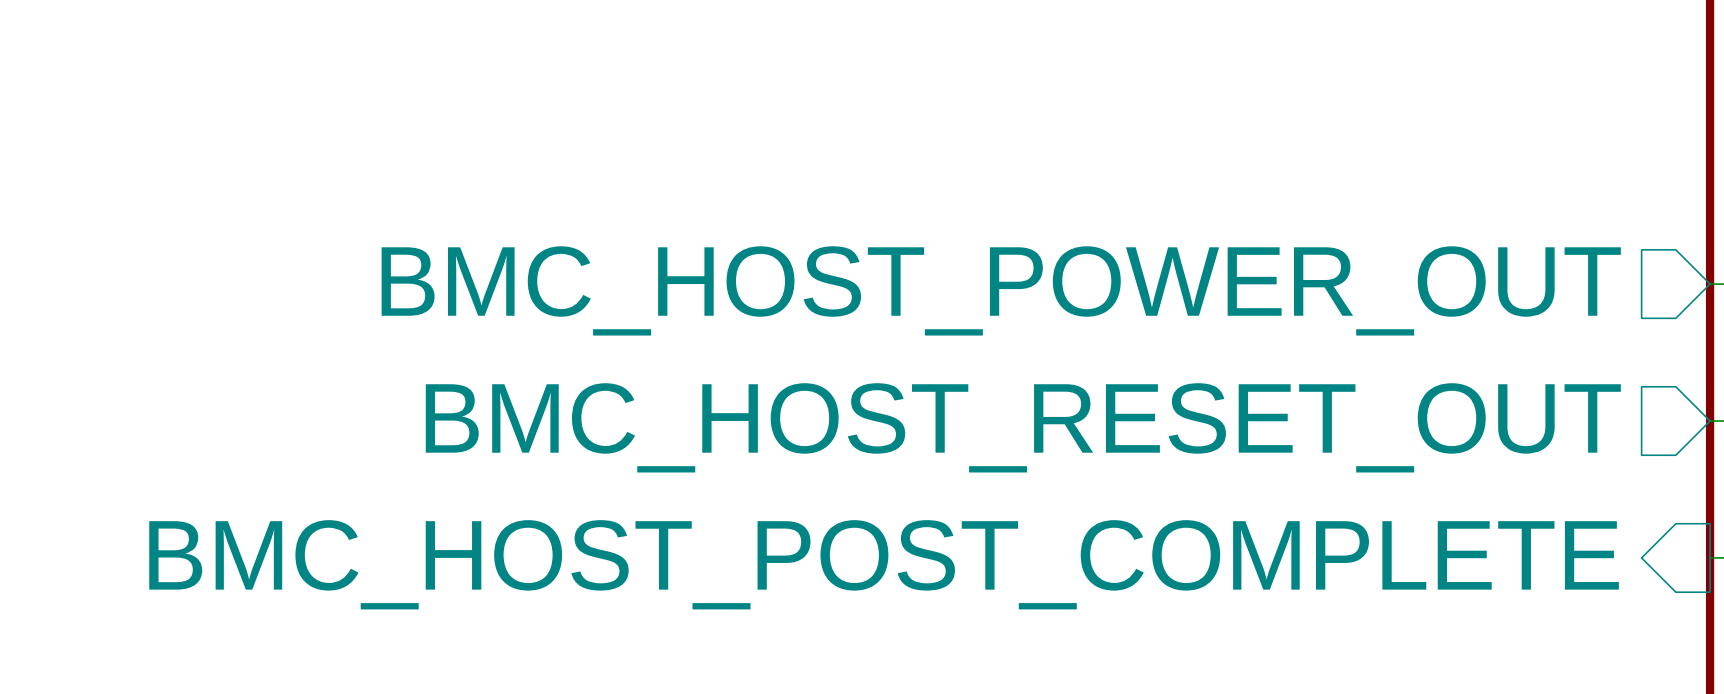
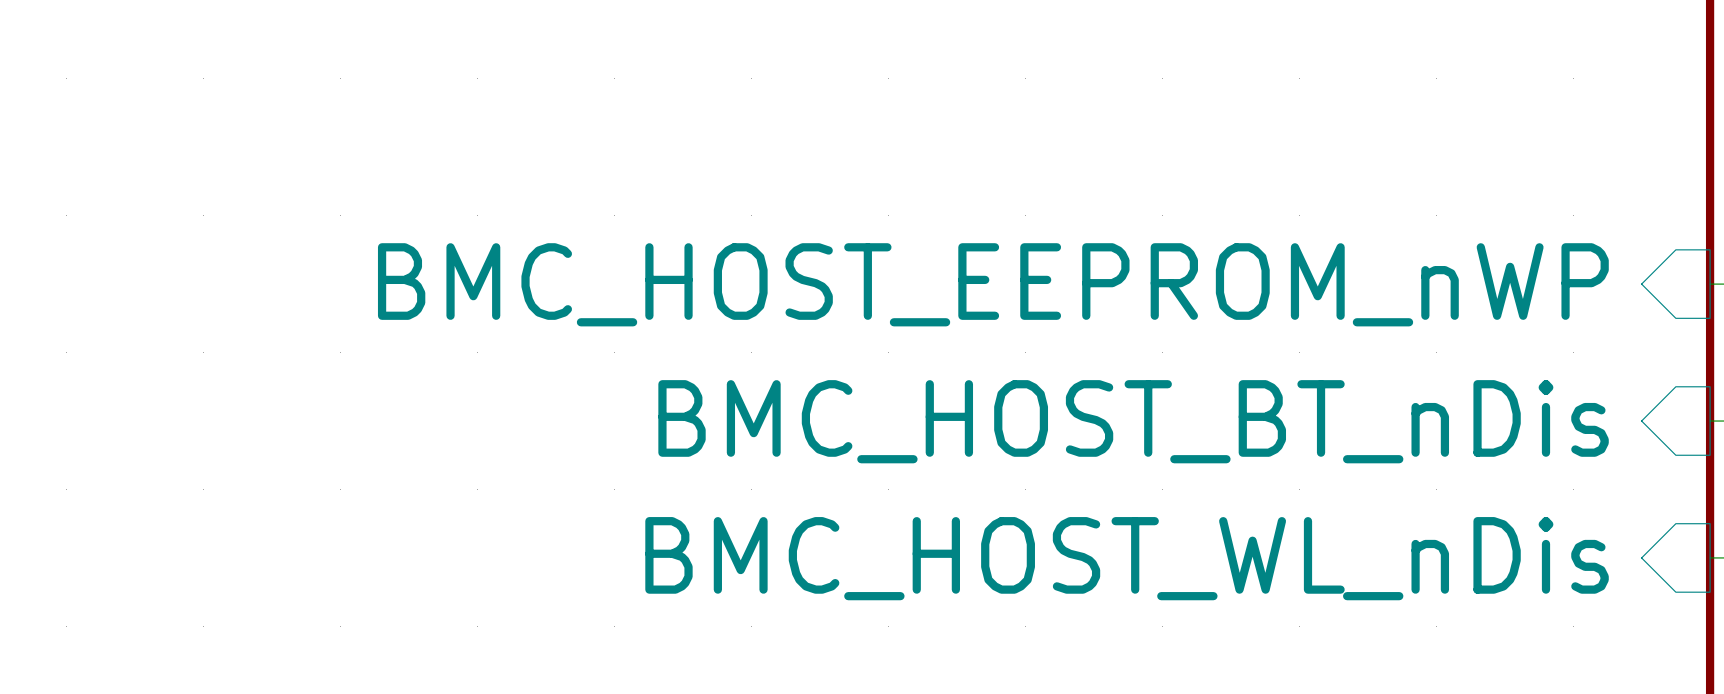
sheet pin shape: output (1001, 290) -> input (993, 284)
sheet pin: BMC_HOST_POWER_OUT (1001, 290) -> BMC_HOST_EEPROM_nWP (993, 284)
sheet pin shape: output (1023, 427) -> input (1133, 421)
sheet pin: BMC_HOST_RESET_OUT (1023, 427) -> BMC_HOST_BT_nDis (1133, 421)
sheet pin: BMC_HOST_POST_COMPLETE (884, 564) -> BMC_HOST_WL_nDis (1127, 558)

